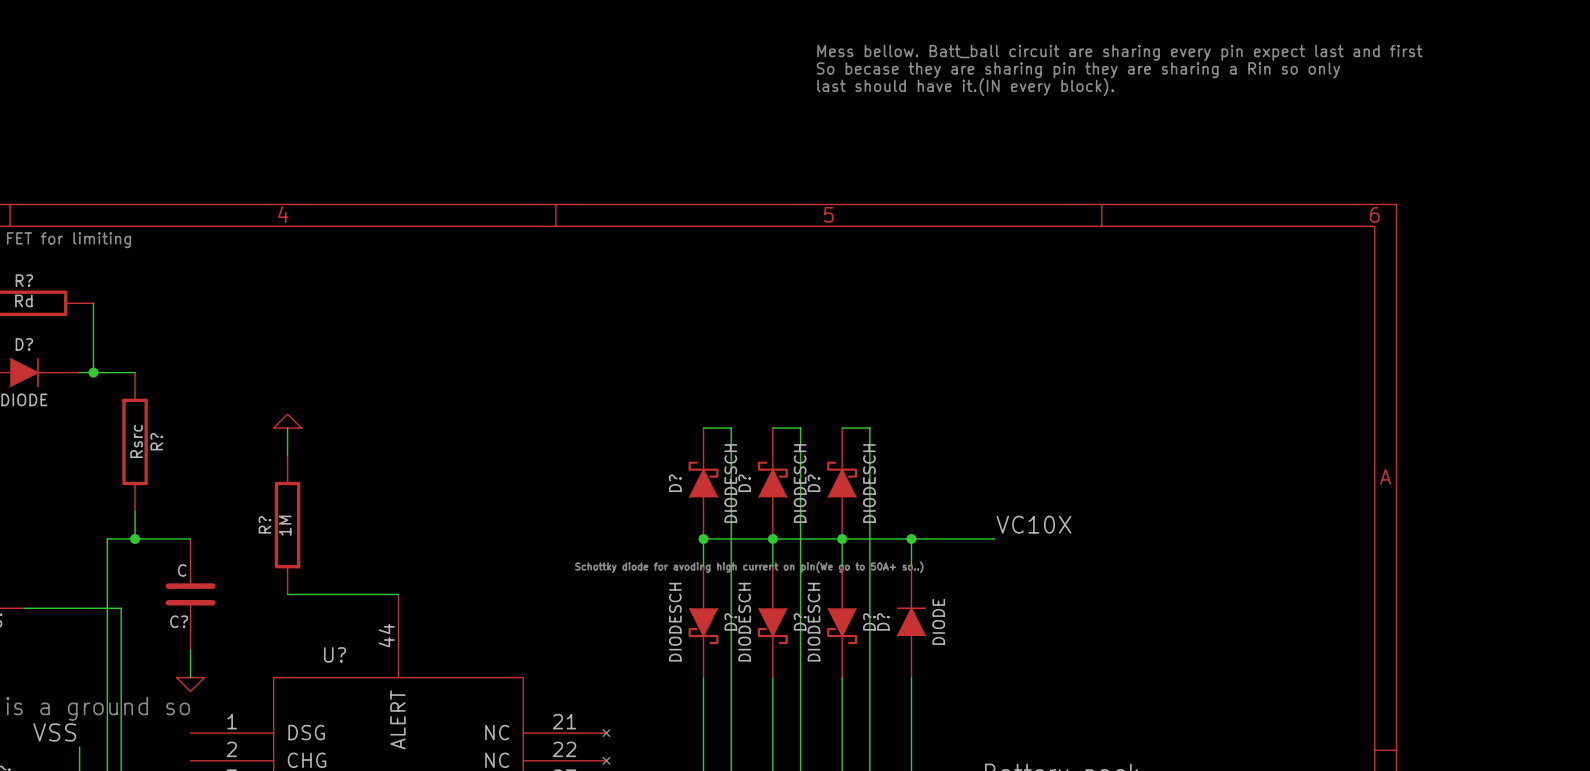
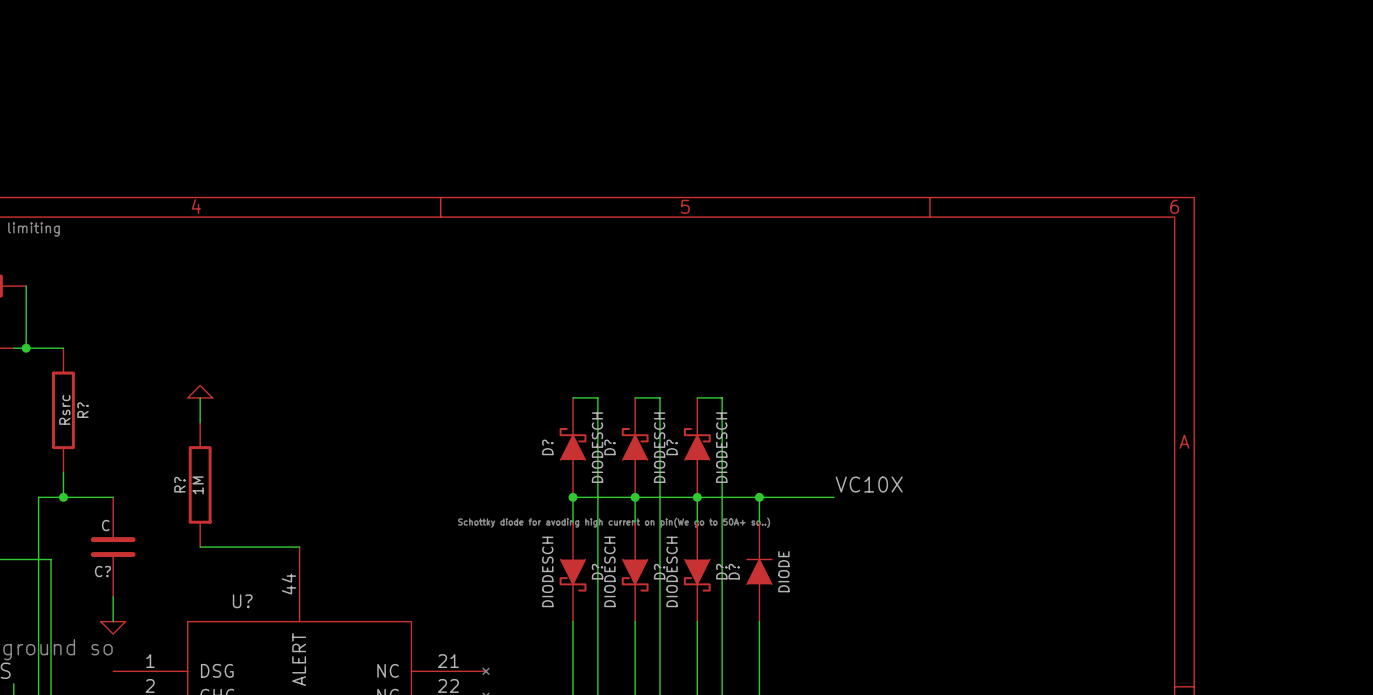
text: Mess bellow. Batt_ball circuit are sharing every pin expect last and first (1119, 52) -> none
text: So becase they are sharing pin they are sharing a Rin so only (1078, 70) -> none
text: last should have it.(IN every block). (965, 87) -> none

